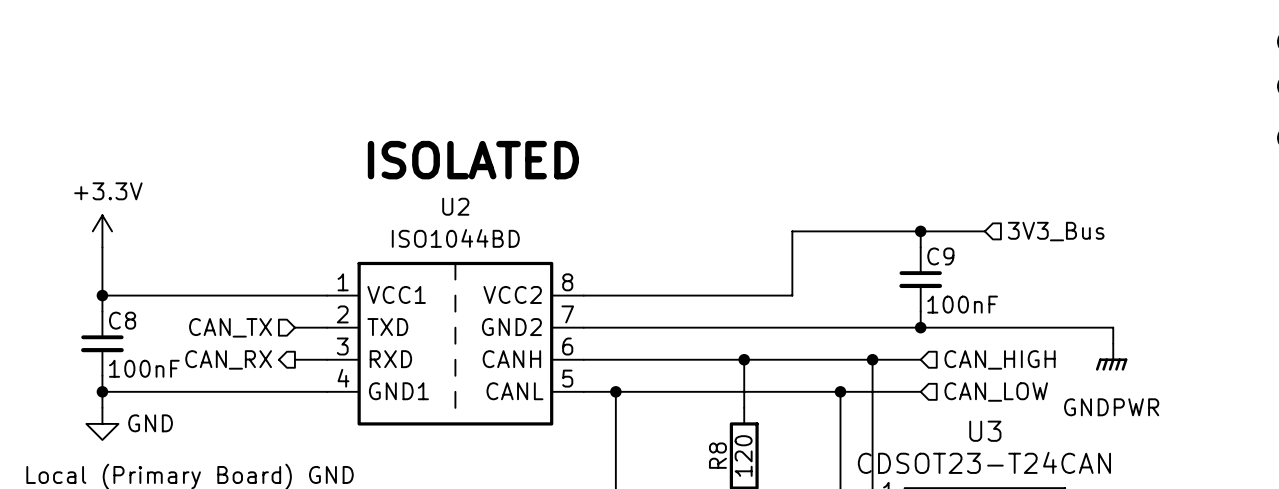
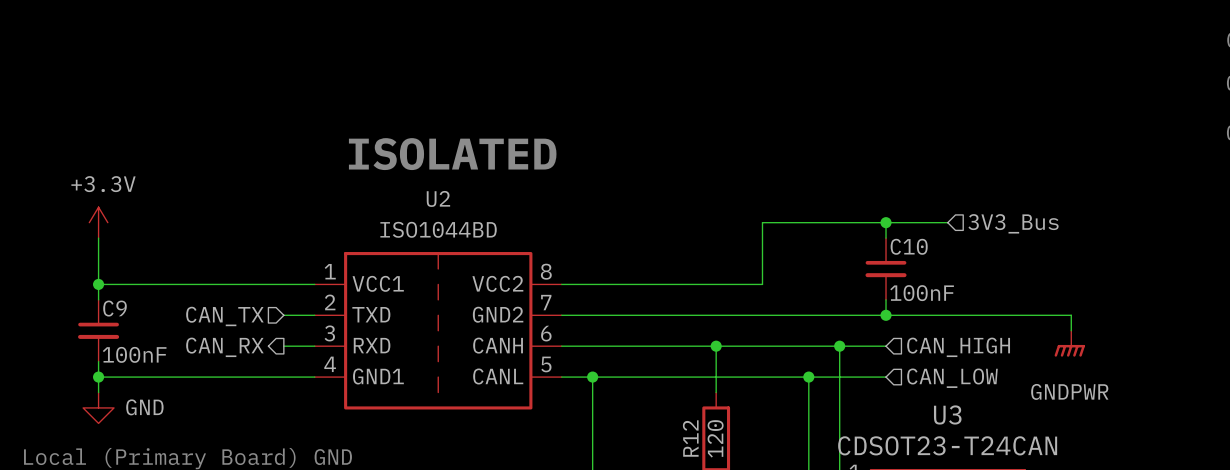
C9 name: C9 (940, 256) -> C10 (909, 246)
C8 name: C8 (122, 320) -> C9 (115, 308)
R8 name: R8 (717, 455) -> R12 (690, 438)

